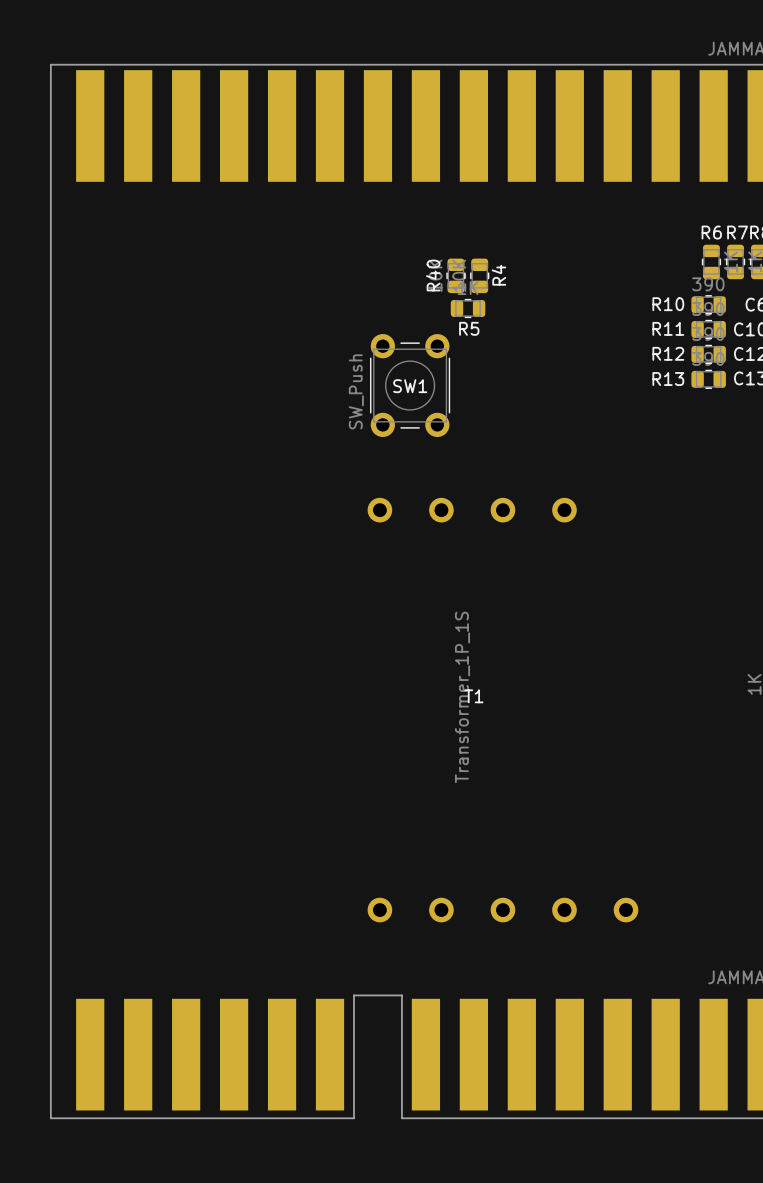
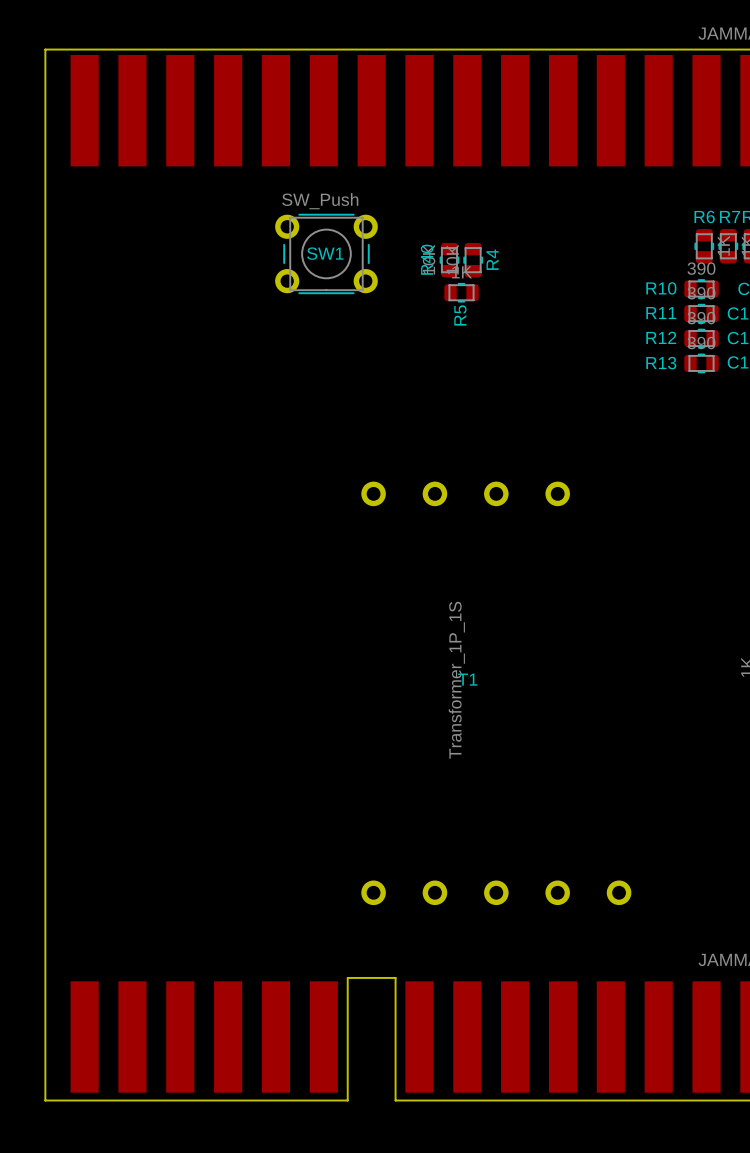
R5 name rotation: 0° (469, 328) -> 90° counterclockwise (460, 315)
SW1 rotation: 0° (410, 385) -> 90° clockwise (326, 253)
SW1 position: (410, 385) -> (326, 253)

